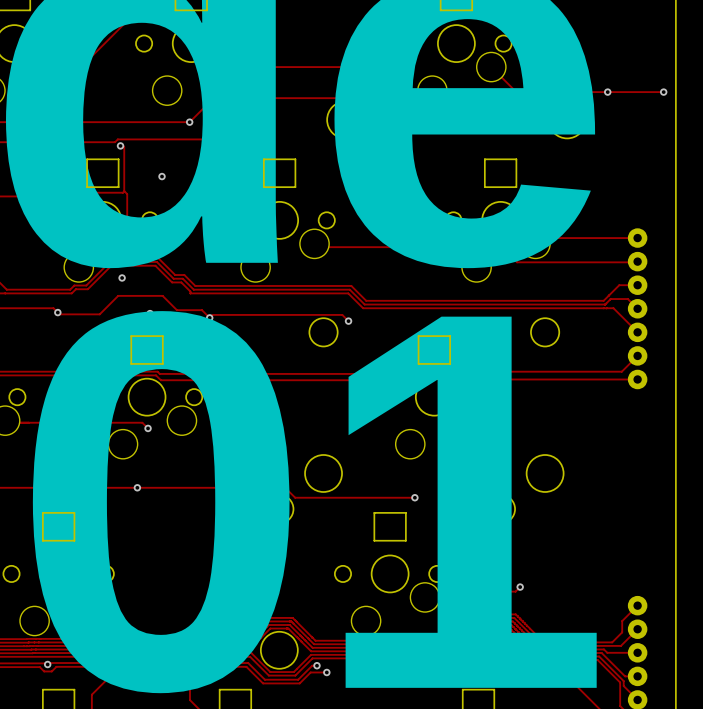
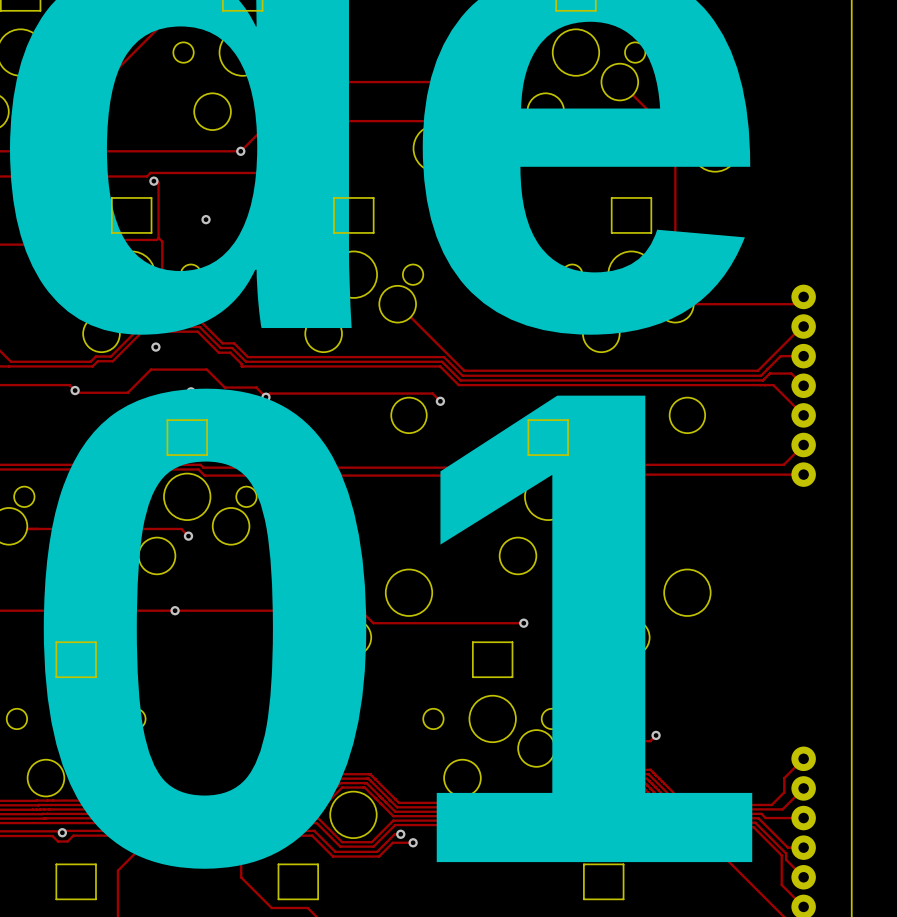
track: (516, 92) (663, 92) -> none
via: (607, 92) -> none
via: (663, 92) -> none
track: (541, 238) (637, 238) -> (651, 113) (675, 137) (675, 304) (796, 304) (803, 296)
track: (317, 247) (501, 247) (517, 262) (635, 262) -> (401, 308) (464, 370) (757, 370) (801, 327)

